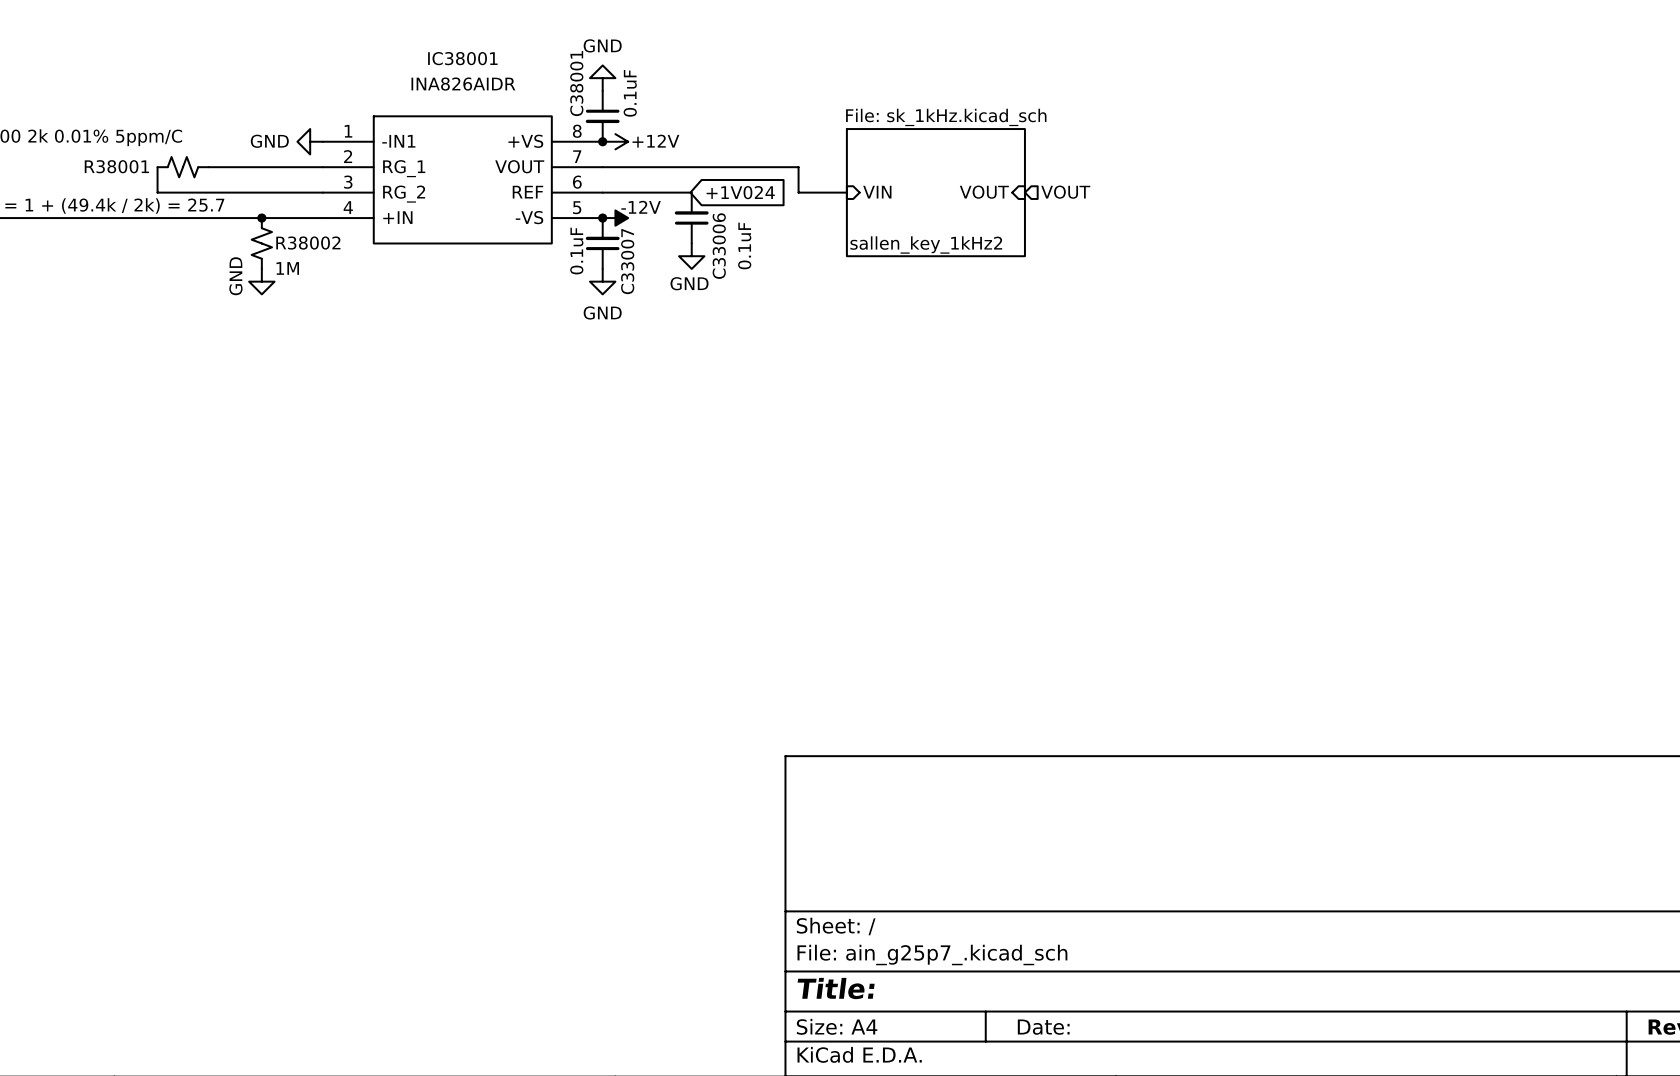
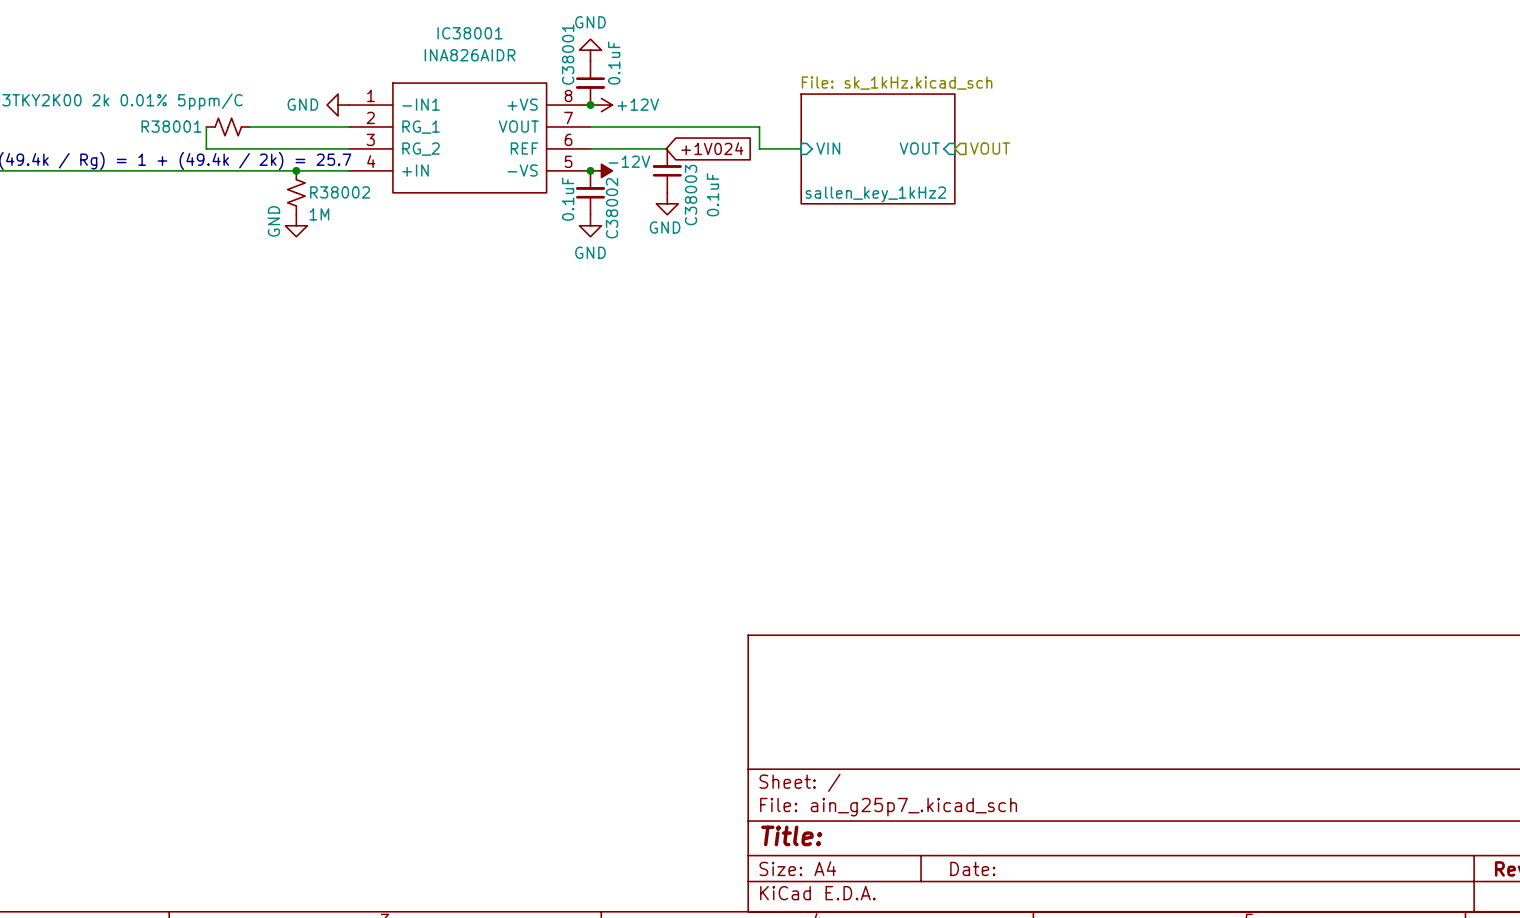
C33006 name: C33006 (719, 246) -> C38003 (691, 195)
C33007 name: C33007 (627, 261) -> C38002 (612, 208)

